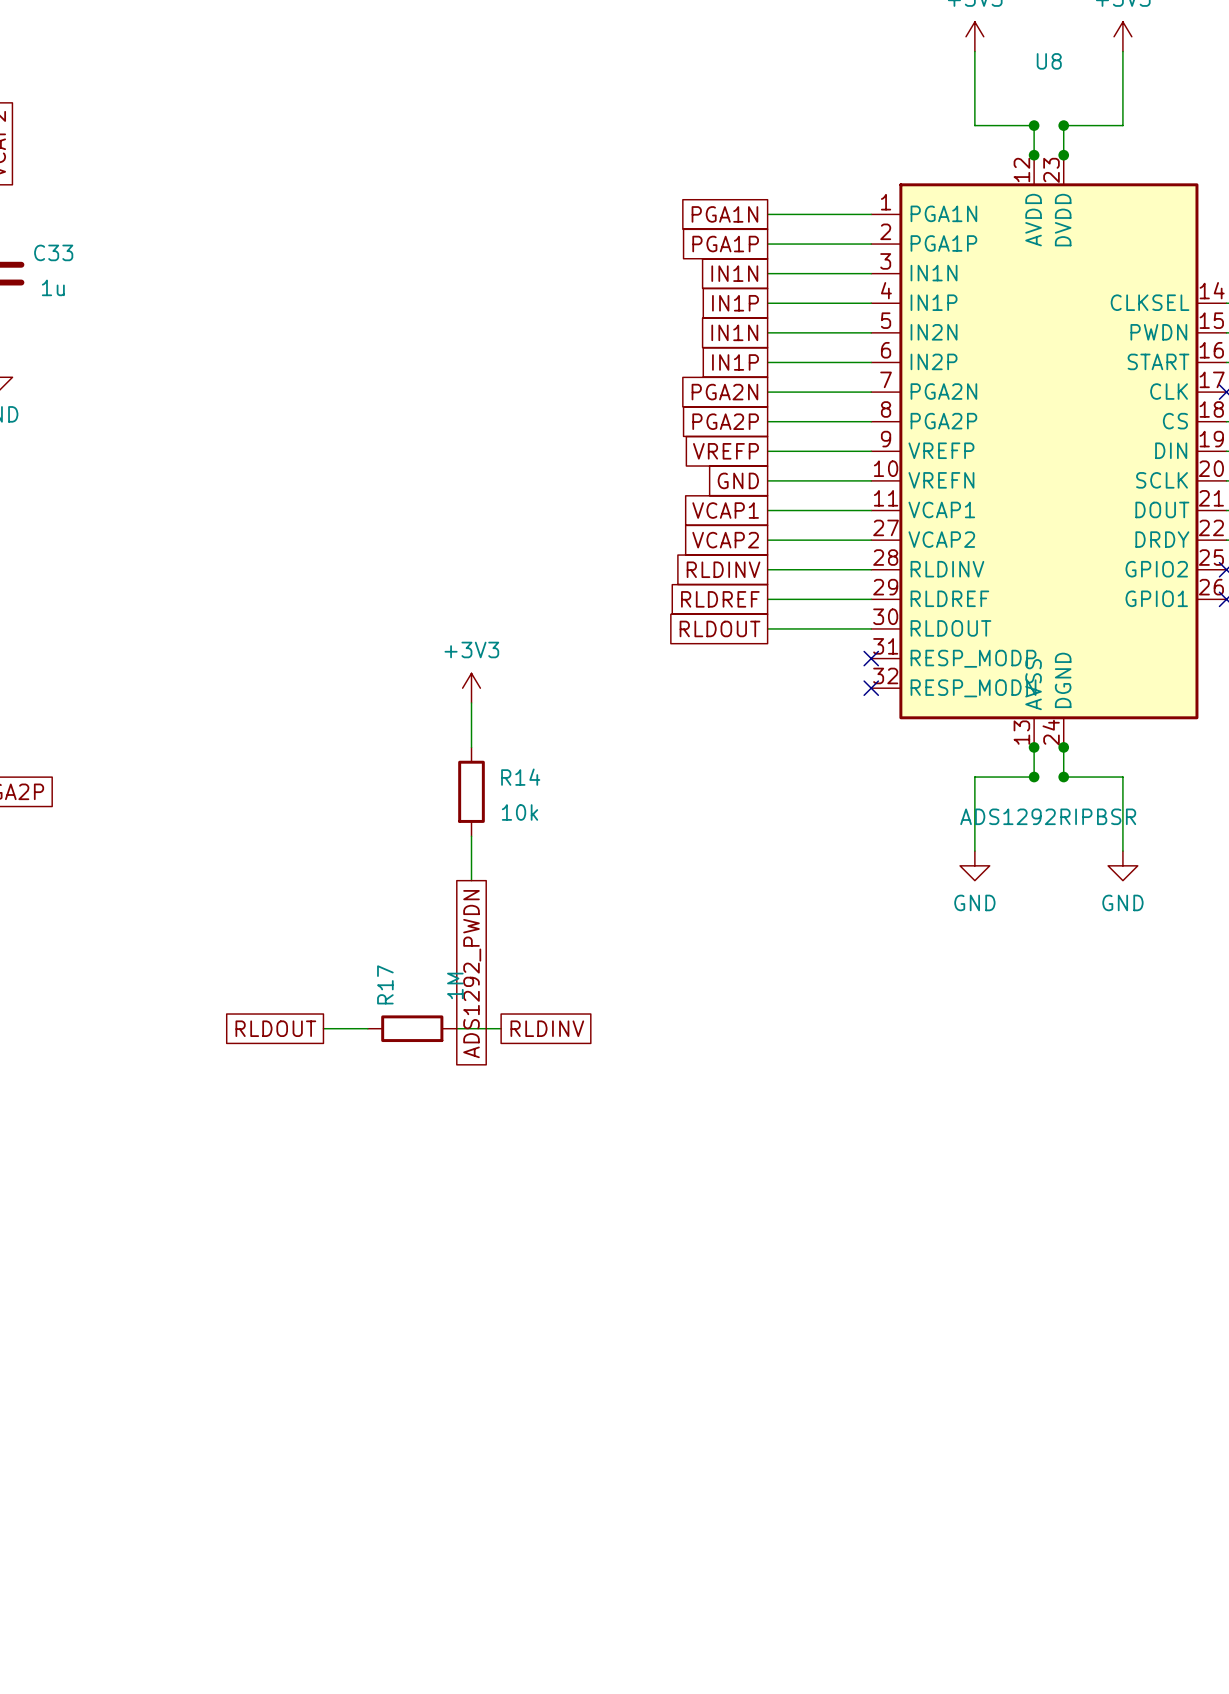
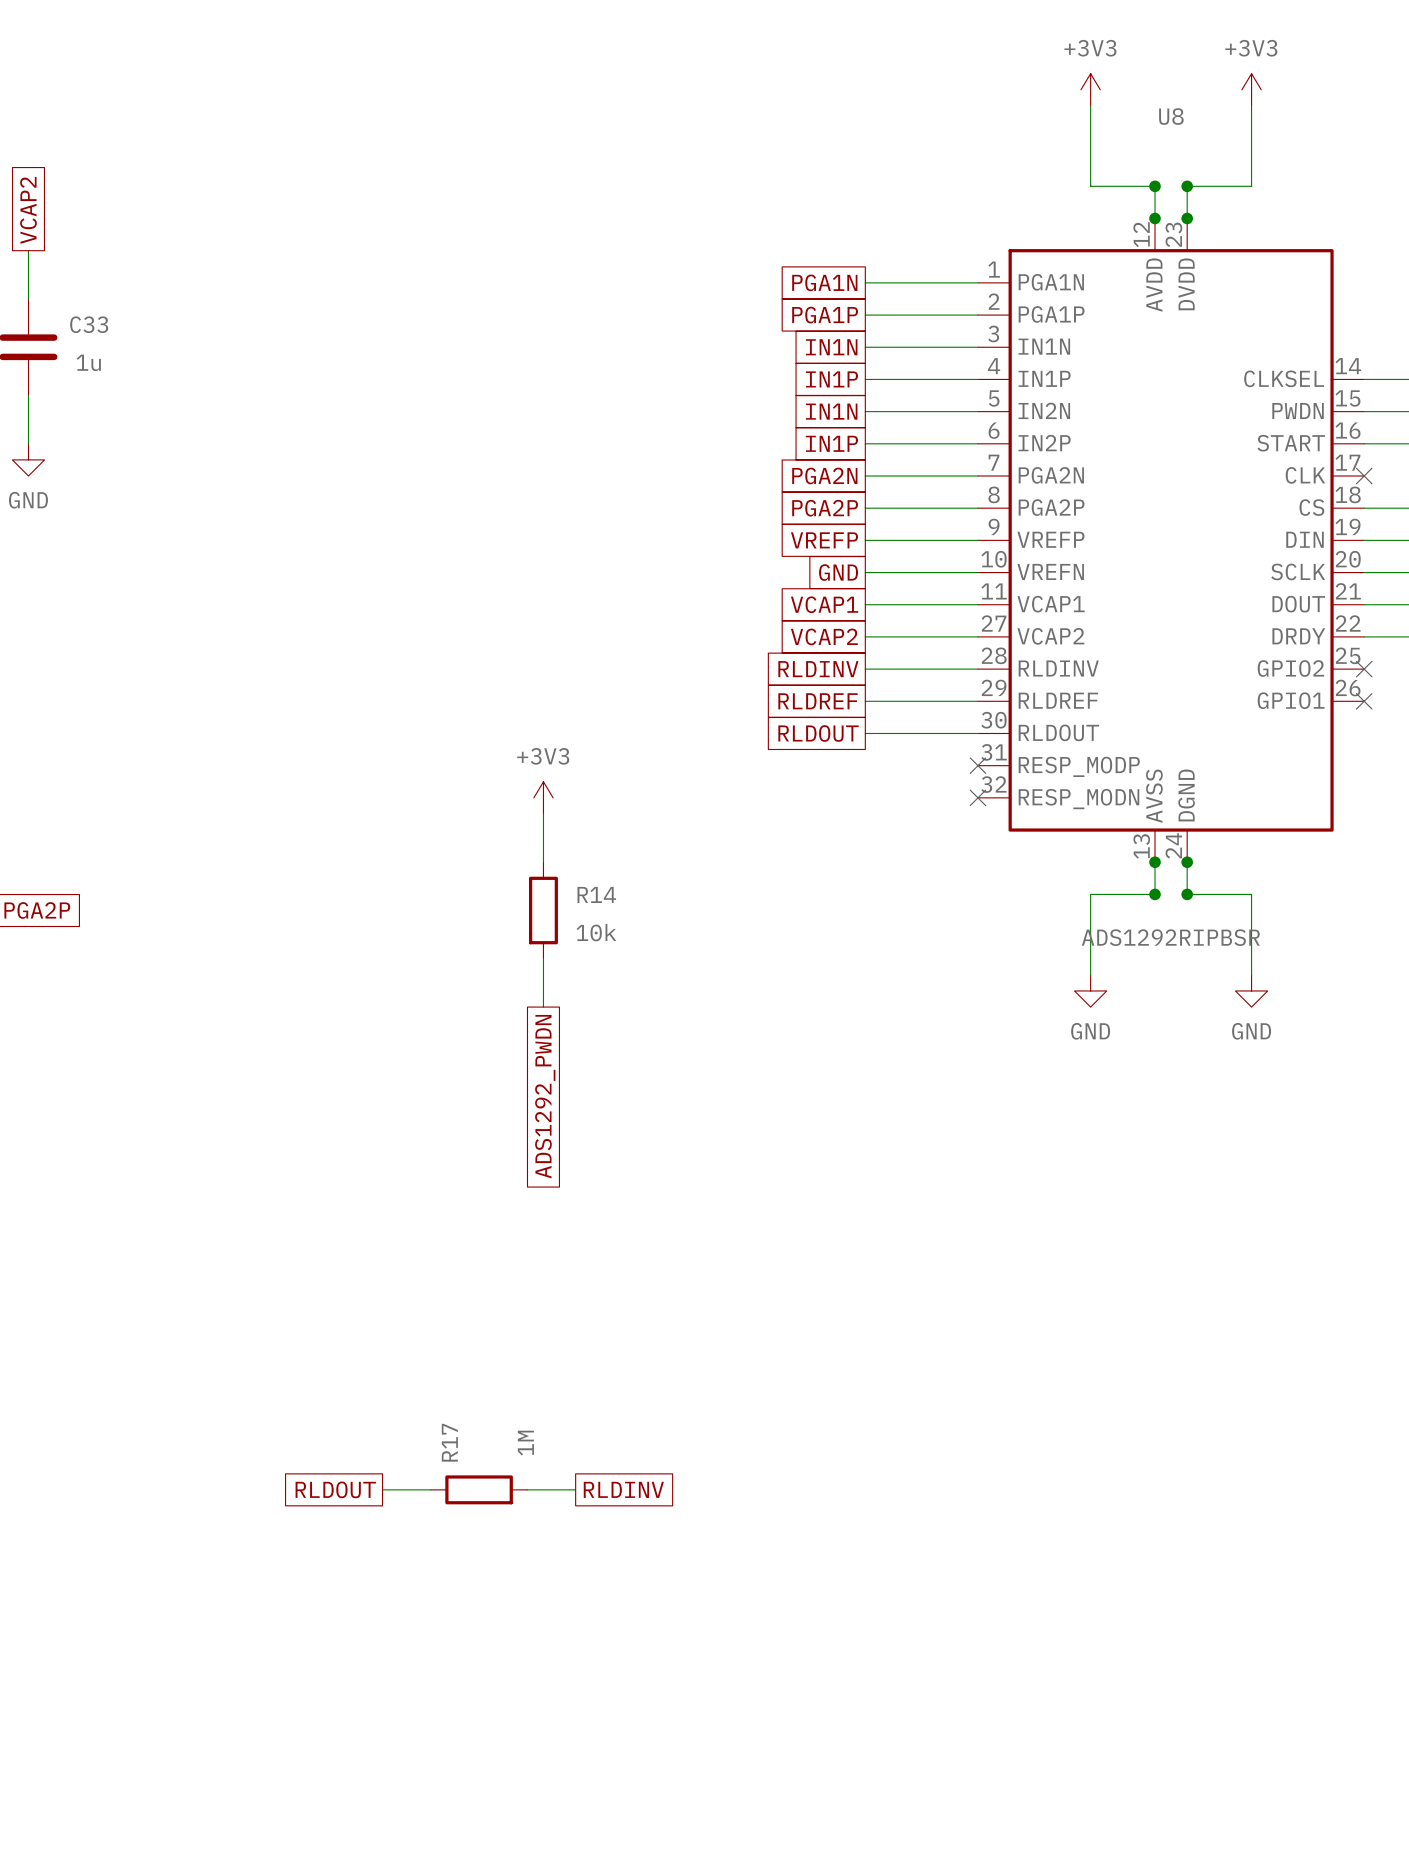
global label: RLDOUT (275, 1028) -> none
wire: (323, 1028) (367, 1028) -> none
R17 position: (412, 1028) -> (479, 1489)
wire: (456, 1028) (501, 1028) -> none
global label: RLDINV (547, 1028) -> none
global label: none -> RLDOUT (335, 1489)
wire: none -> (382, 1489) (430, 1489)
wire: none -> (527, 1489) (575, 1489)
global label: none -> RLDINV (623, 1489)

